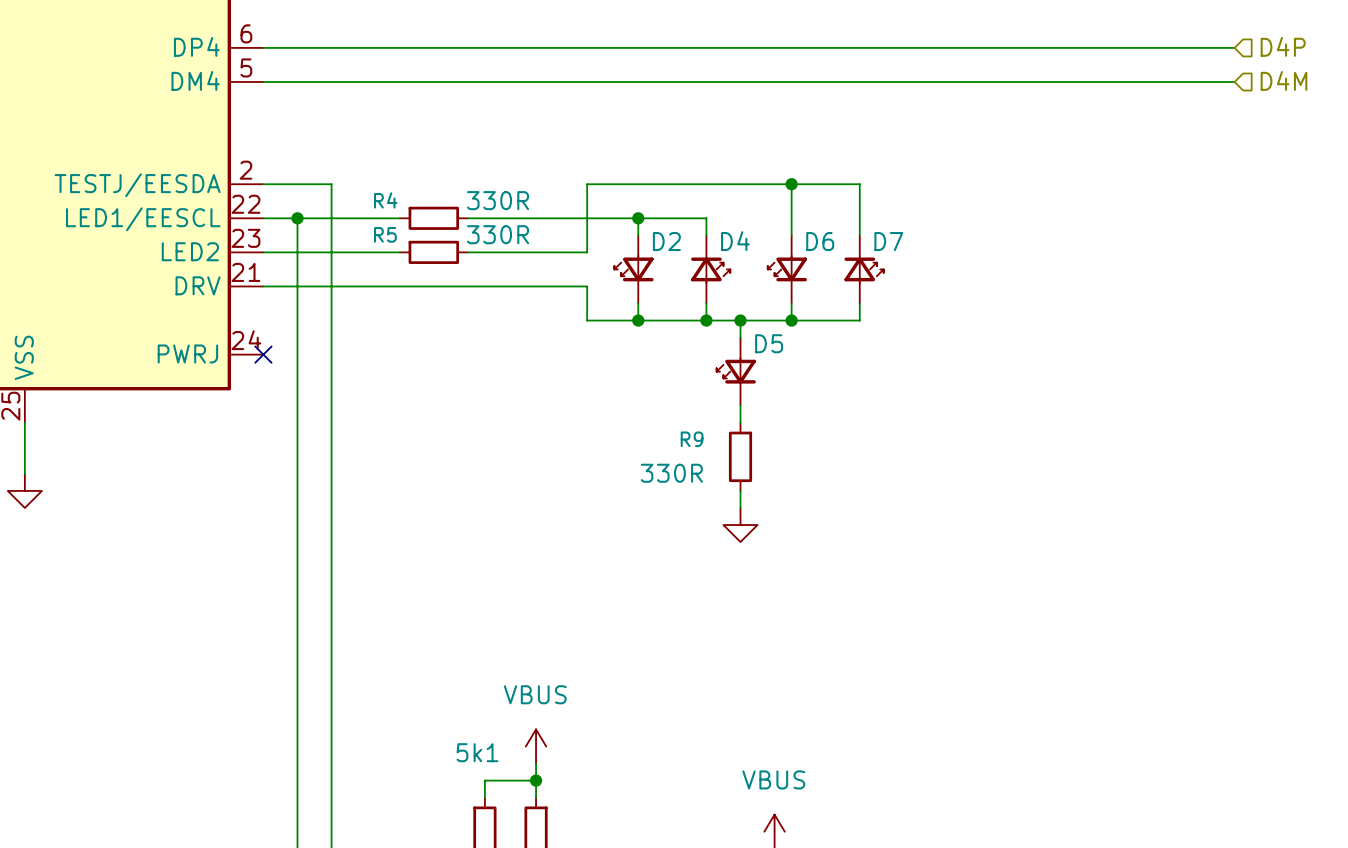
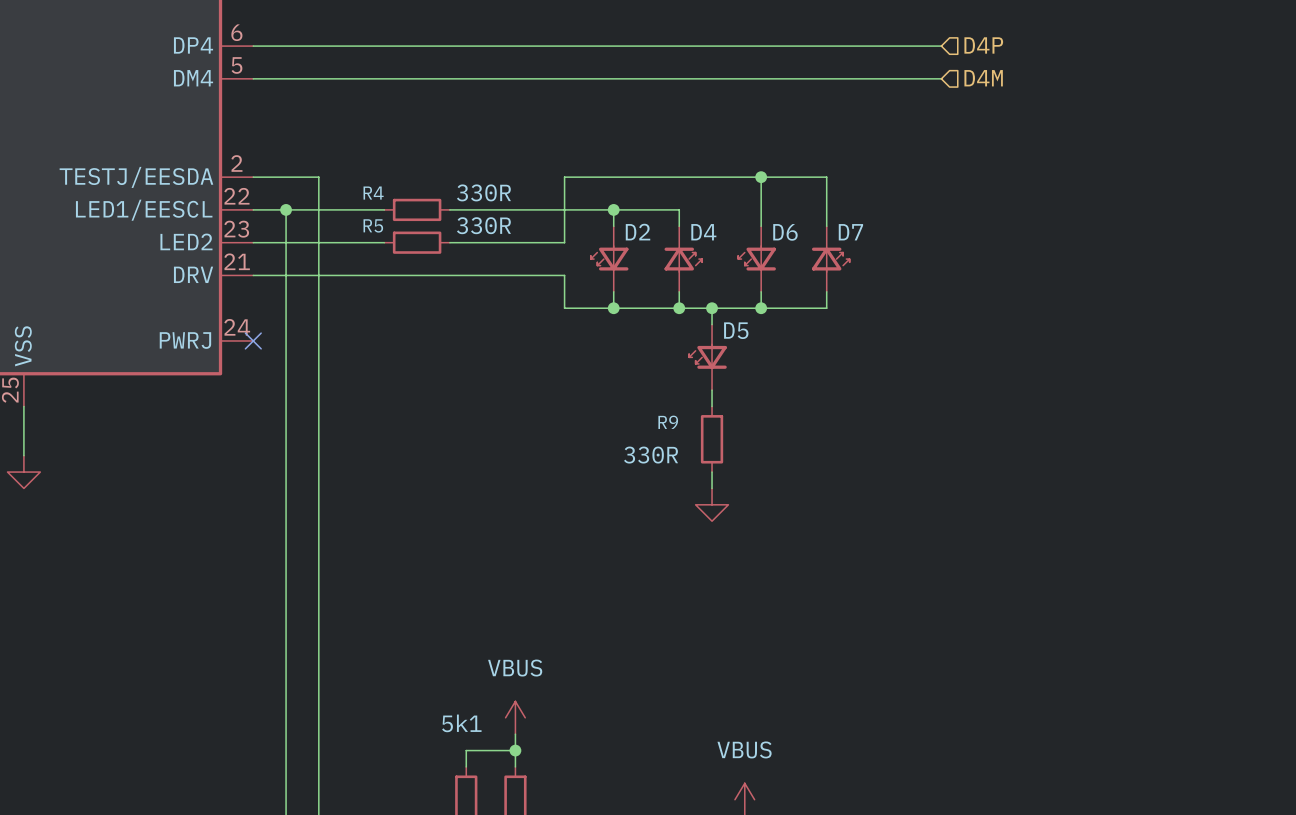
hierarchical label position: D4P (1283, 46) -> D4P (983, 45)
wire: (979, 47) (1234, 47) -> none
hierarchical label position: D4M (1283, 80) -> D4M (983, 78)
wire: (979, 82) (1234, 82) -> none

